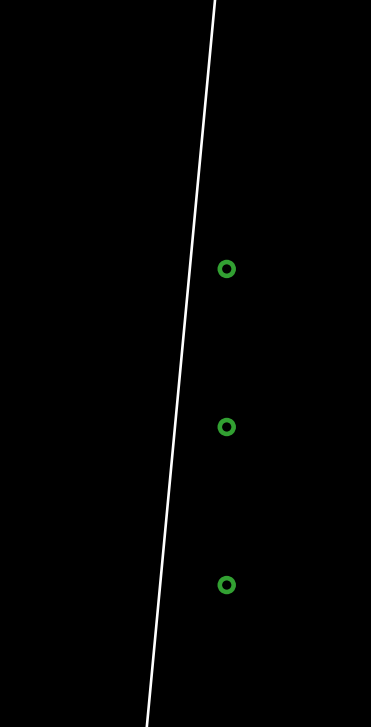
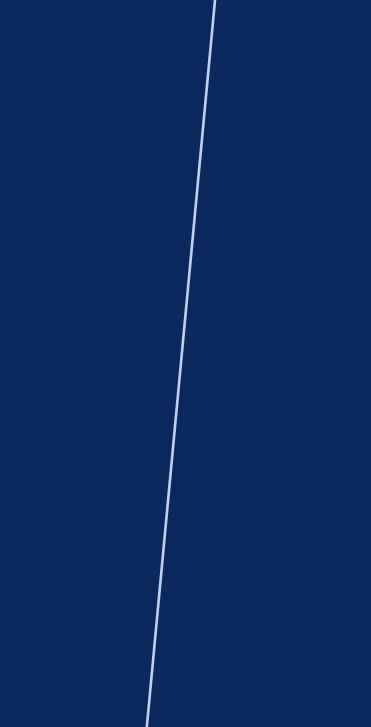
via: (226, 268) -> none
via: (226, 426) -> none
via: (226, 585) -> none

